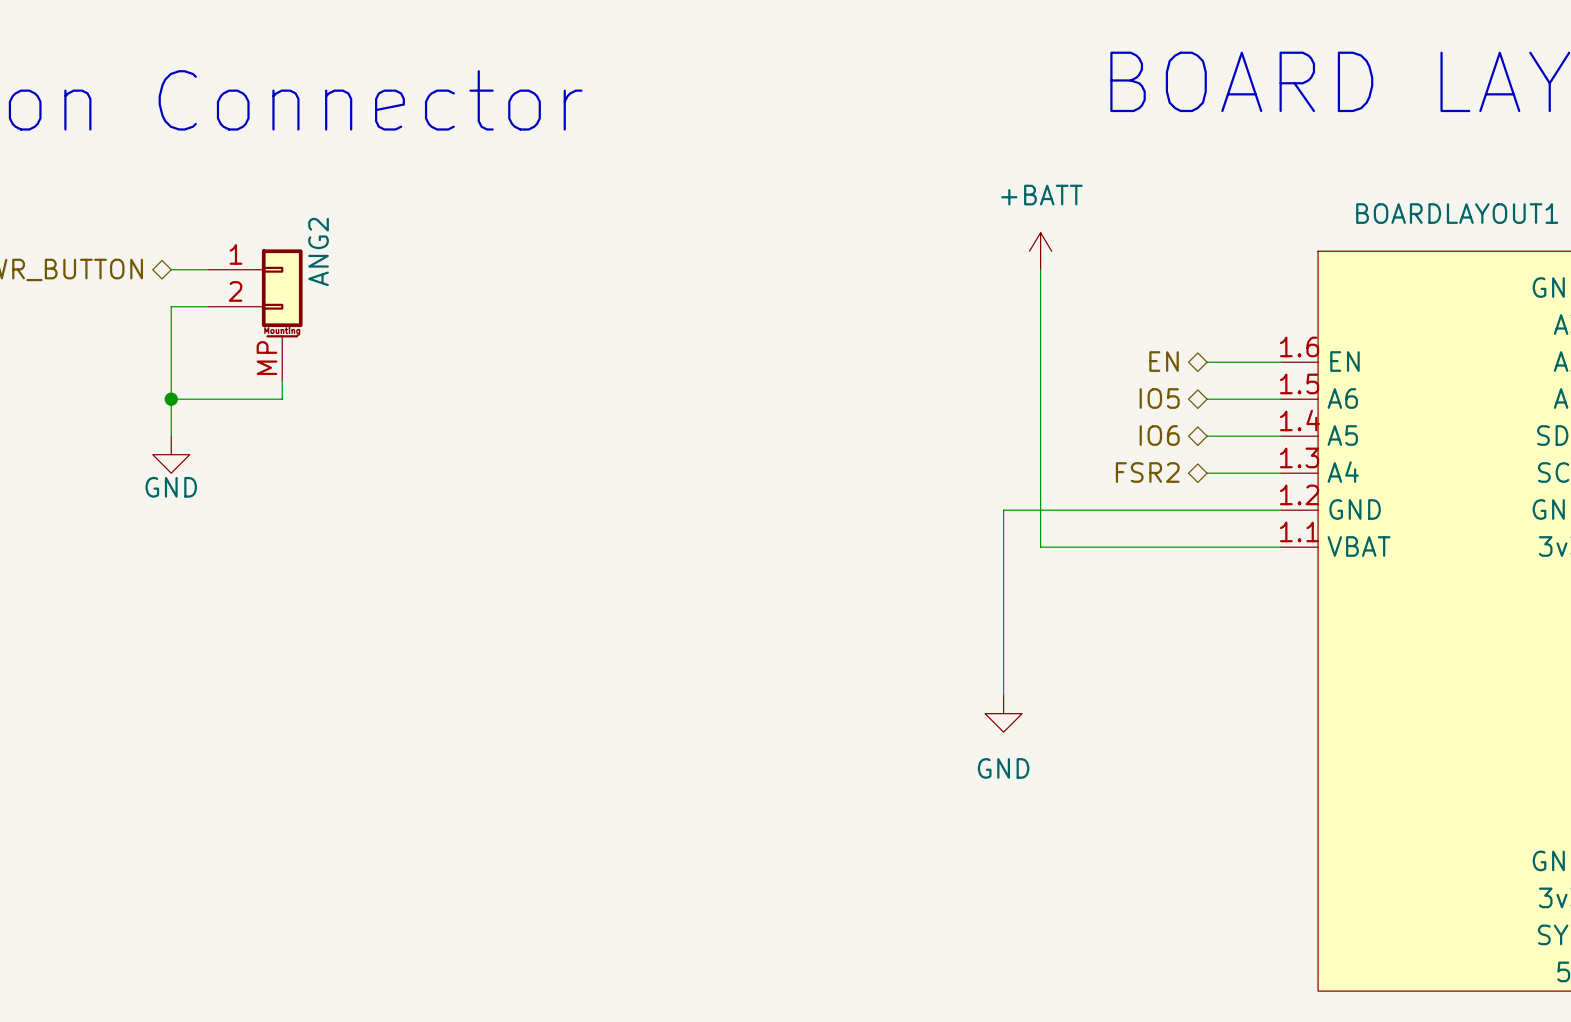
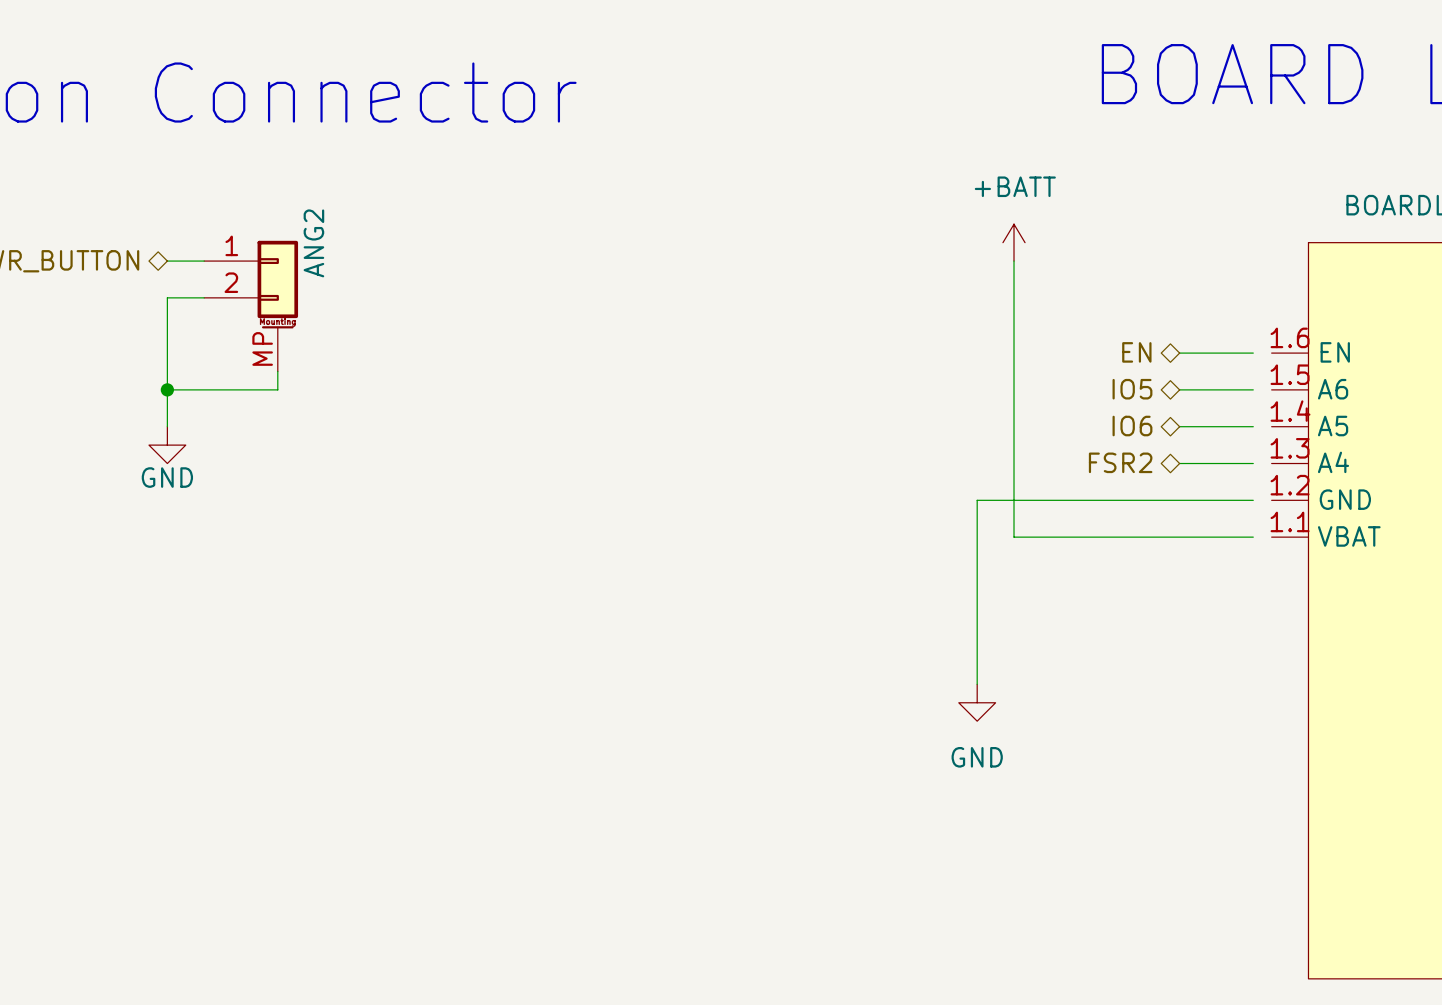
power symbol position: +BATT (1040, 251) -> +BATT (1014, 242)
wire: (1040, 269) (1040, 547) -> (1014, 261) (1014, 537) (1032, 537)
hierarchical label position: EN (1164, 361) -> EN (1136, 352)
wire: (1262, 362) (1281, 362) -> (1179, 353) (1198, 353)
hierarchical label position: IO5 (1159, 398) -> IO5 (1132, 389)
wire: (1262, 399) (1281, 399) -> (1179, 389) (1198, 389)
hierarchical label position: IO6 (1159, 435) -> IO6 (1132, 426)
wire: (1262, 436) (1281, 436) -> (1179, 426) (1198, 426)
hierarchical label position: FSR2 (1147, 472) -> FSR2 (1120, 462)
wire: (1262, 473) (1281, 473) -> (1179, 463) (1198, 463)
wire: (1003, 510) (1003, 695) -> (995, 500) (977, 500) (977, 684)
wire: (1262, 510) (1281, 510) -> none
wire: (1262, 547) (1281, 547) -> none
power symbol position: GND (1003, 713) -> GND (977, 702)

